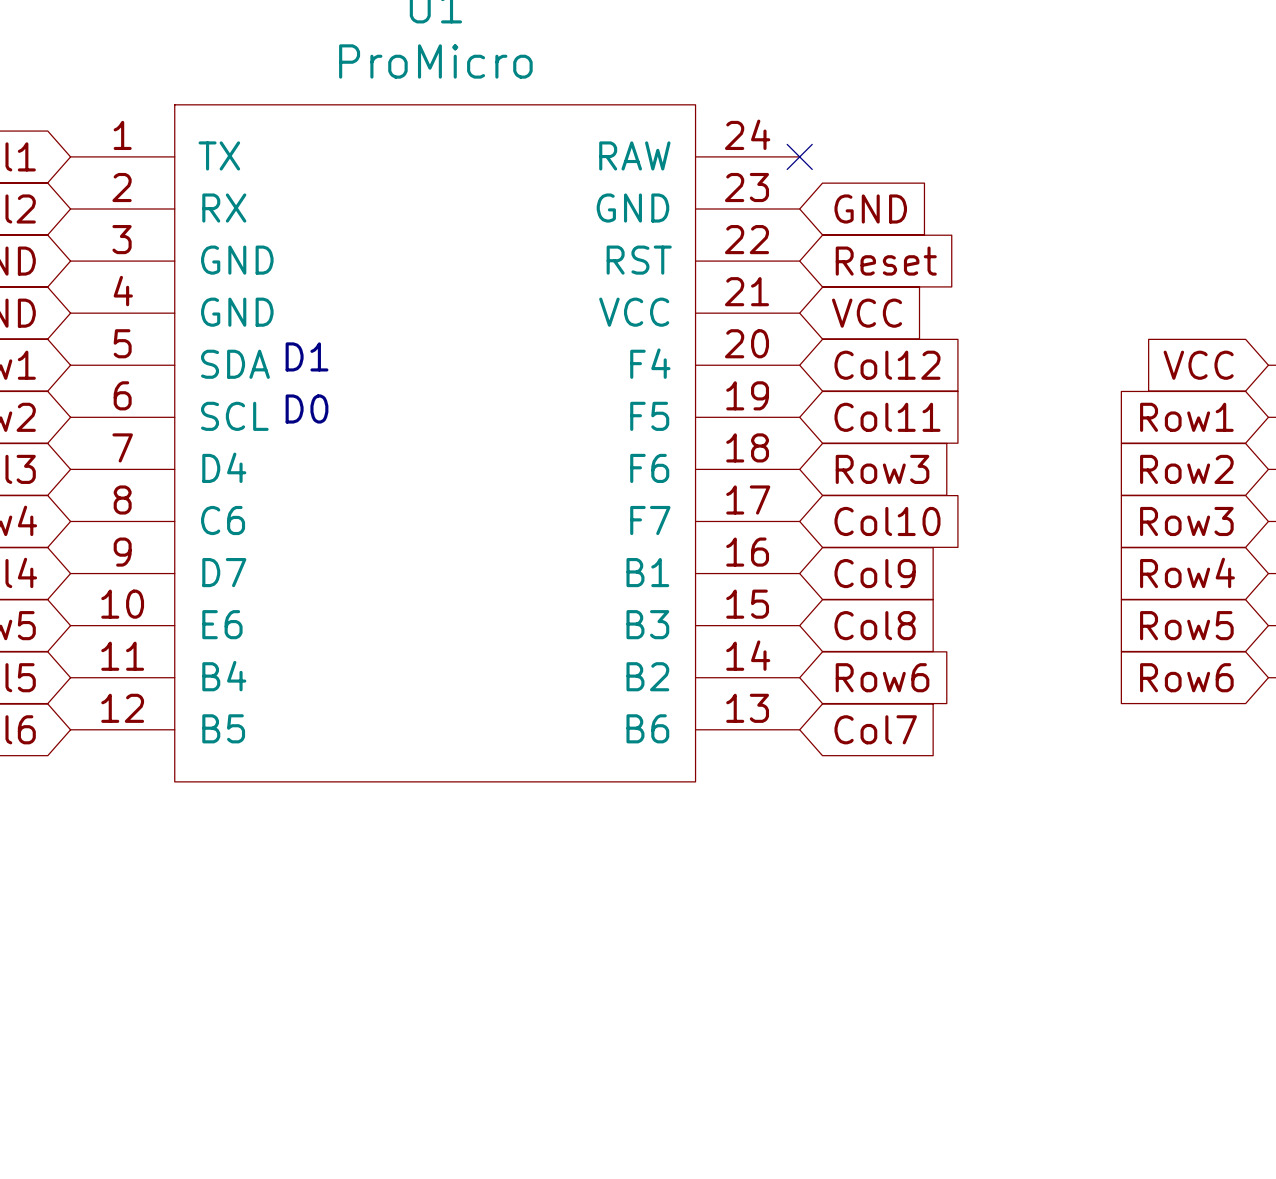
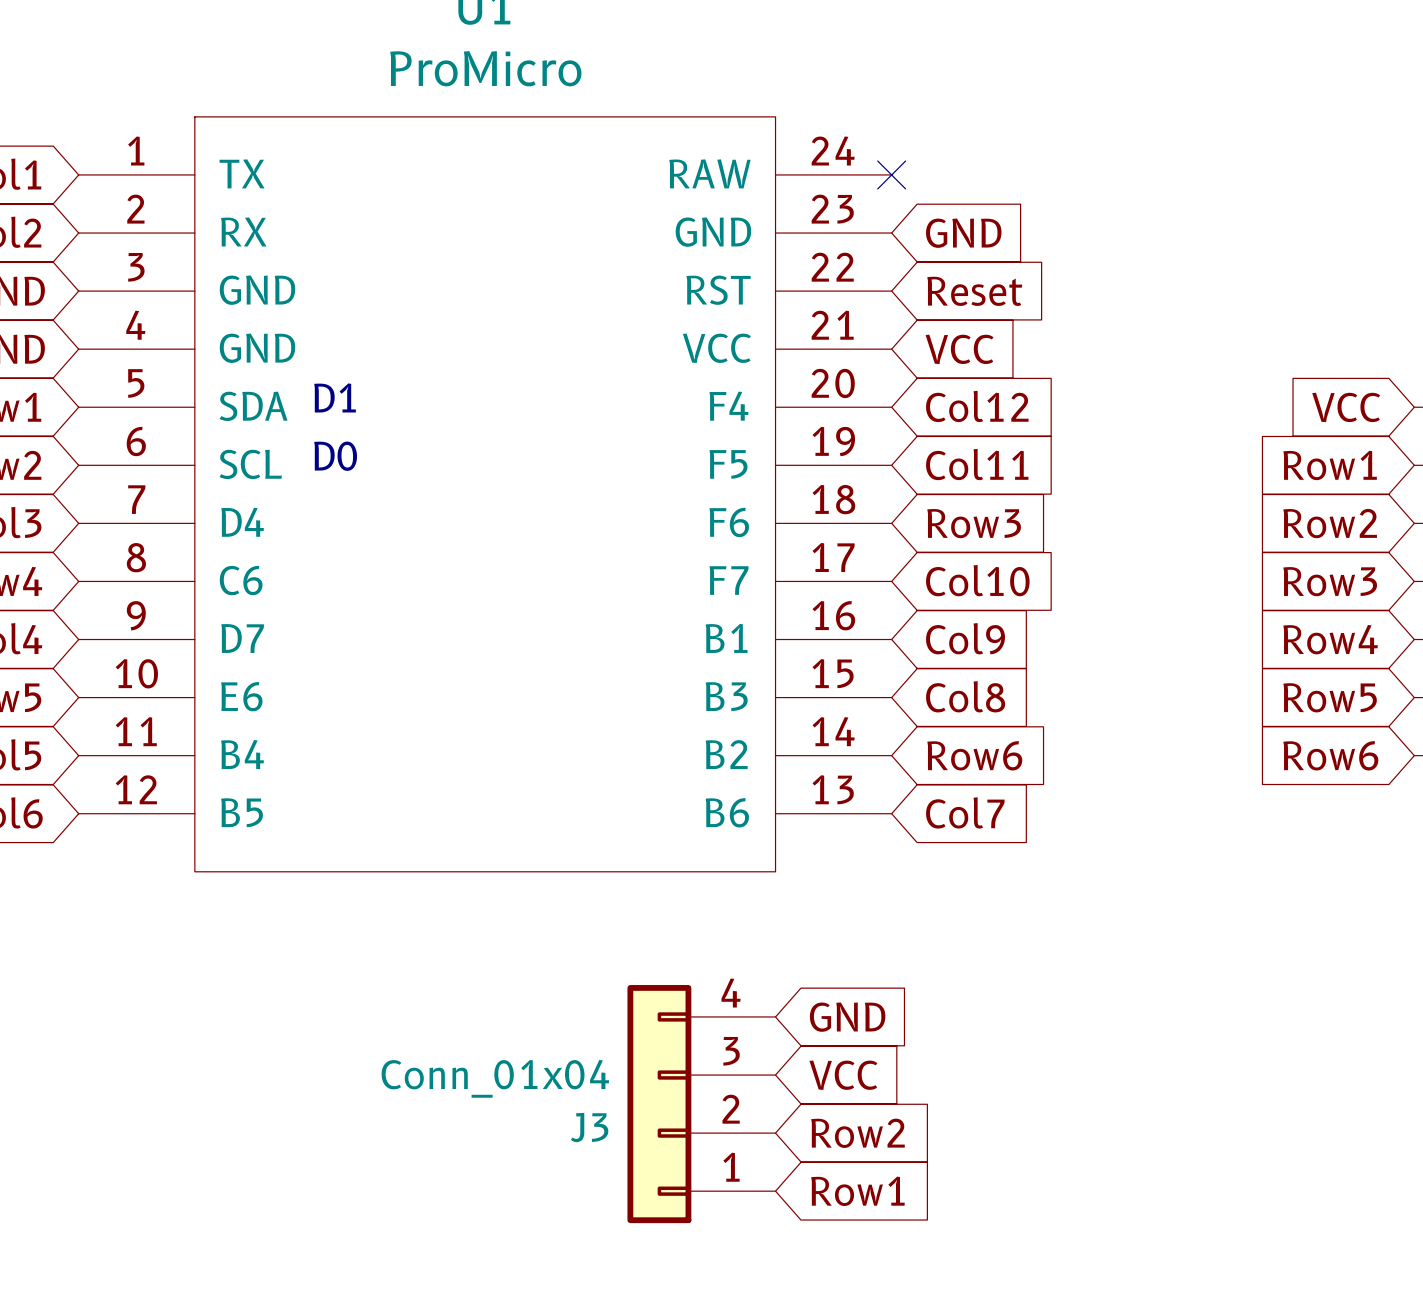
global label: none -> GND (847, 1017)
global label: none -> VCC (843, 1075)
J3: none -> Conn_01x04 (701, 1104)
global label: none -> Row2 (857, 1133)
global label: none -> Row1 (857, 1191)

